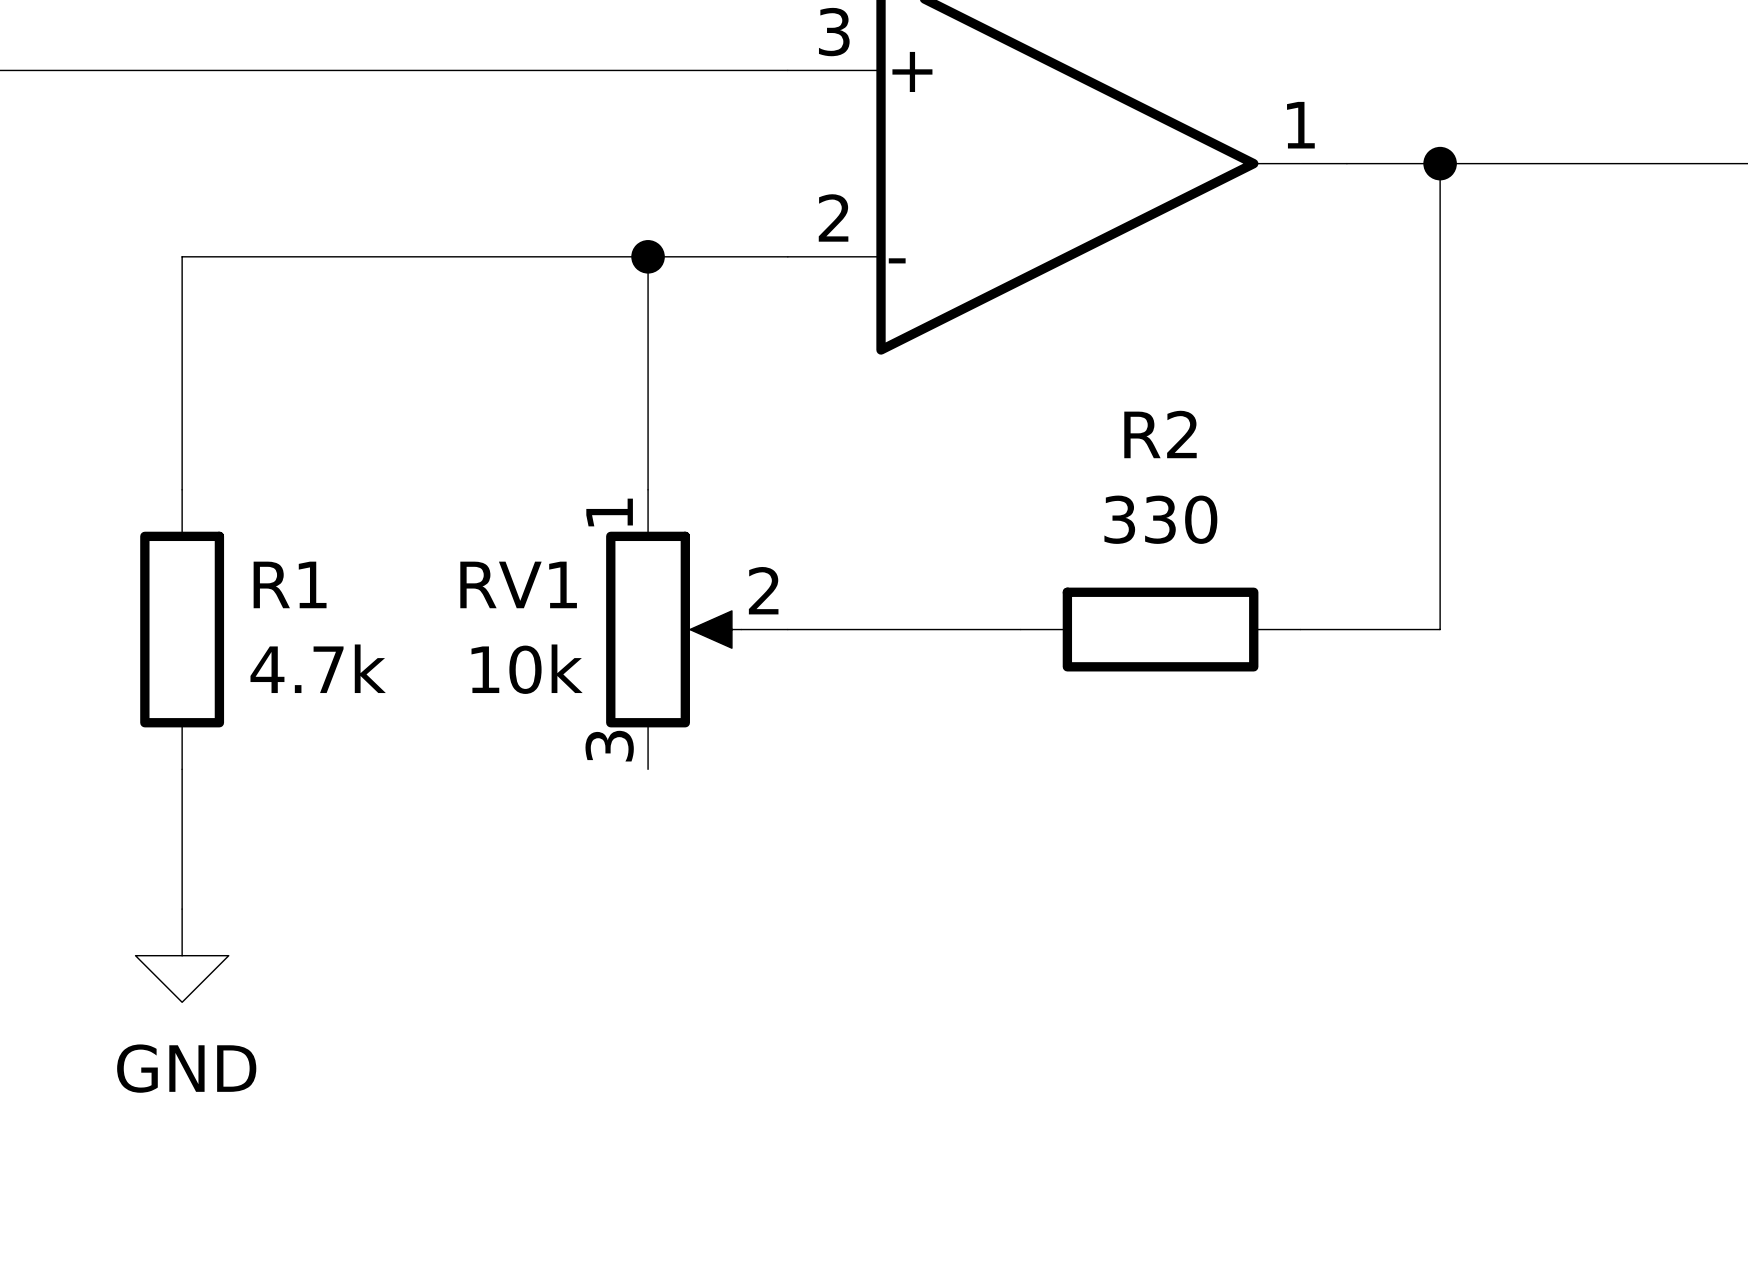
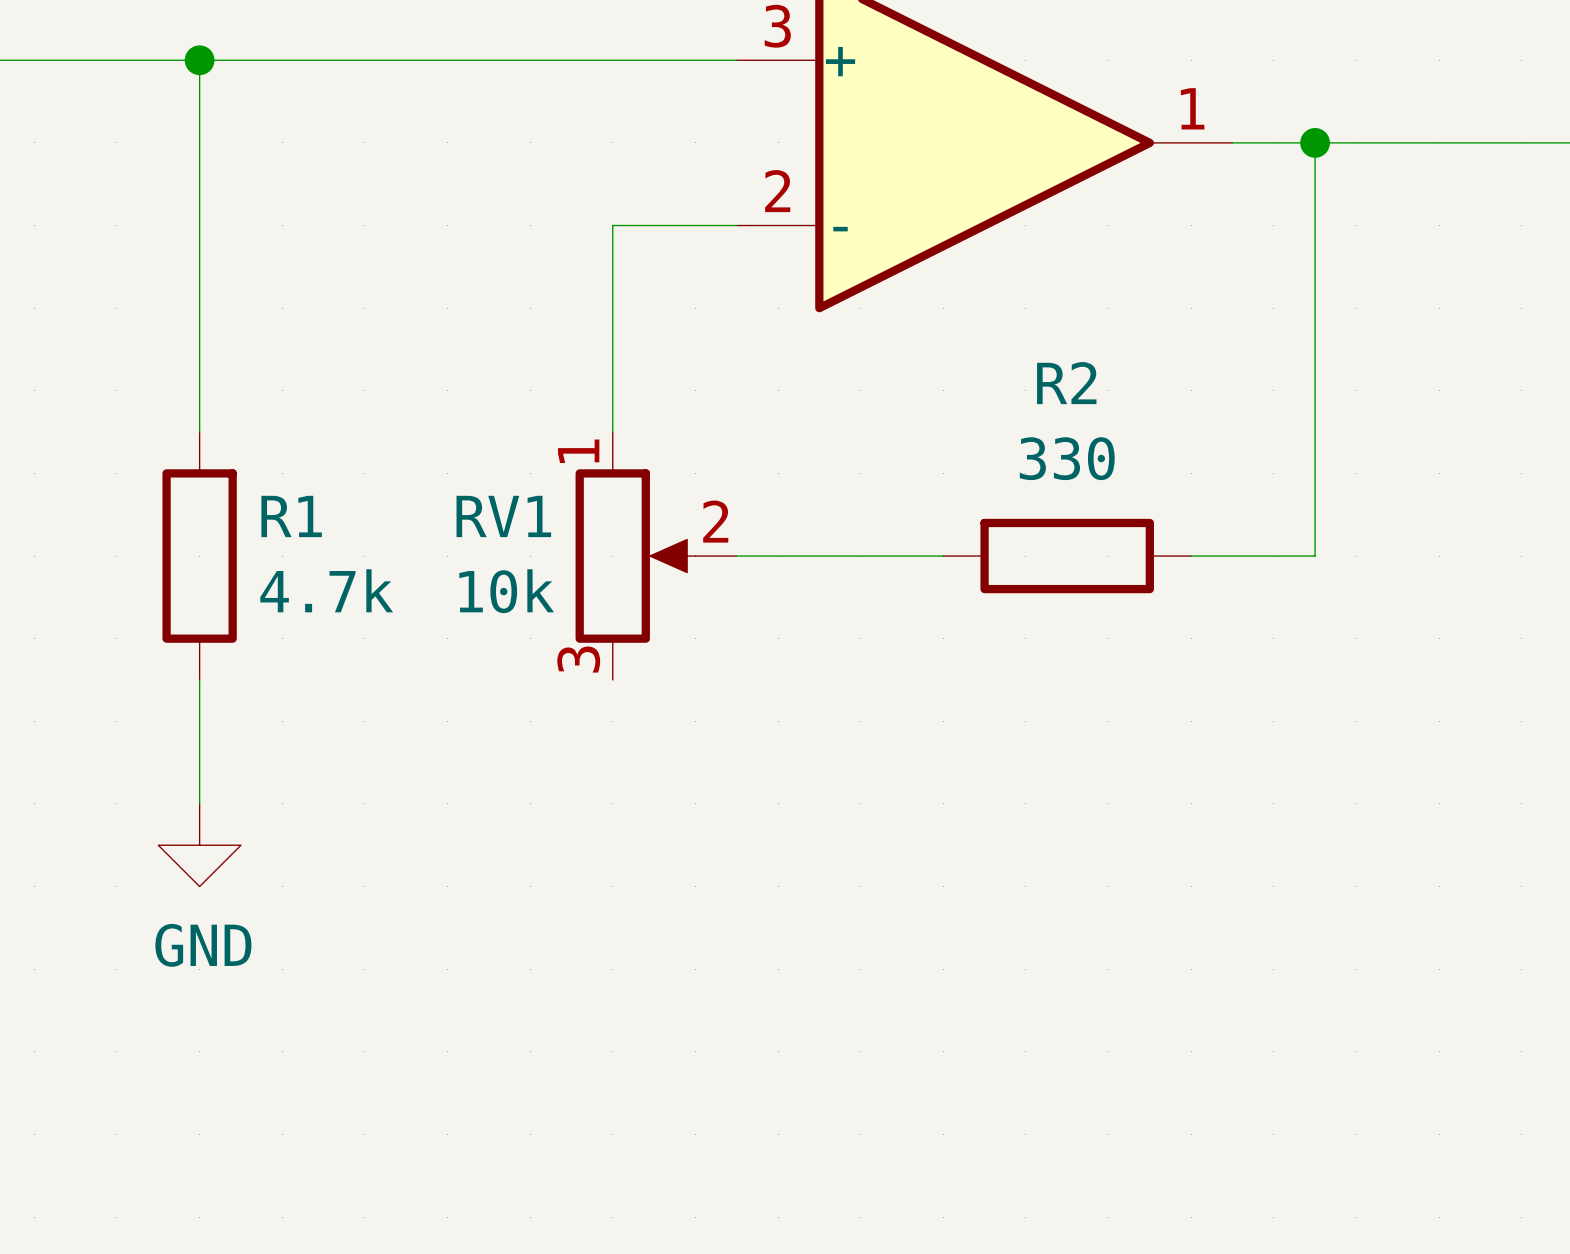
junction: none -> (199, 60)
wire: (182, 256) (648, 256) -> (199, 225) (199, 60)
junction: (648, 256) -> none

